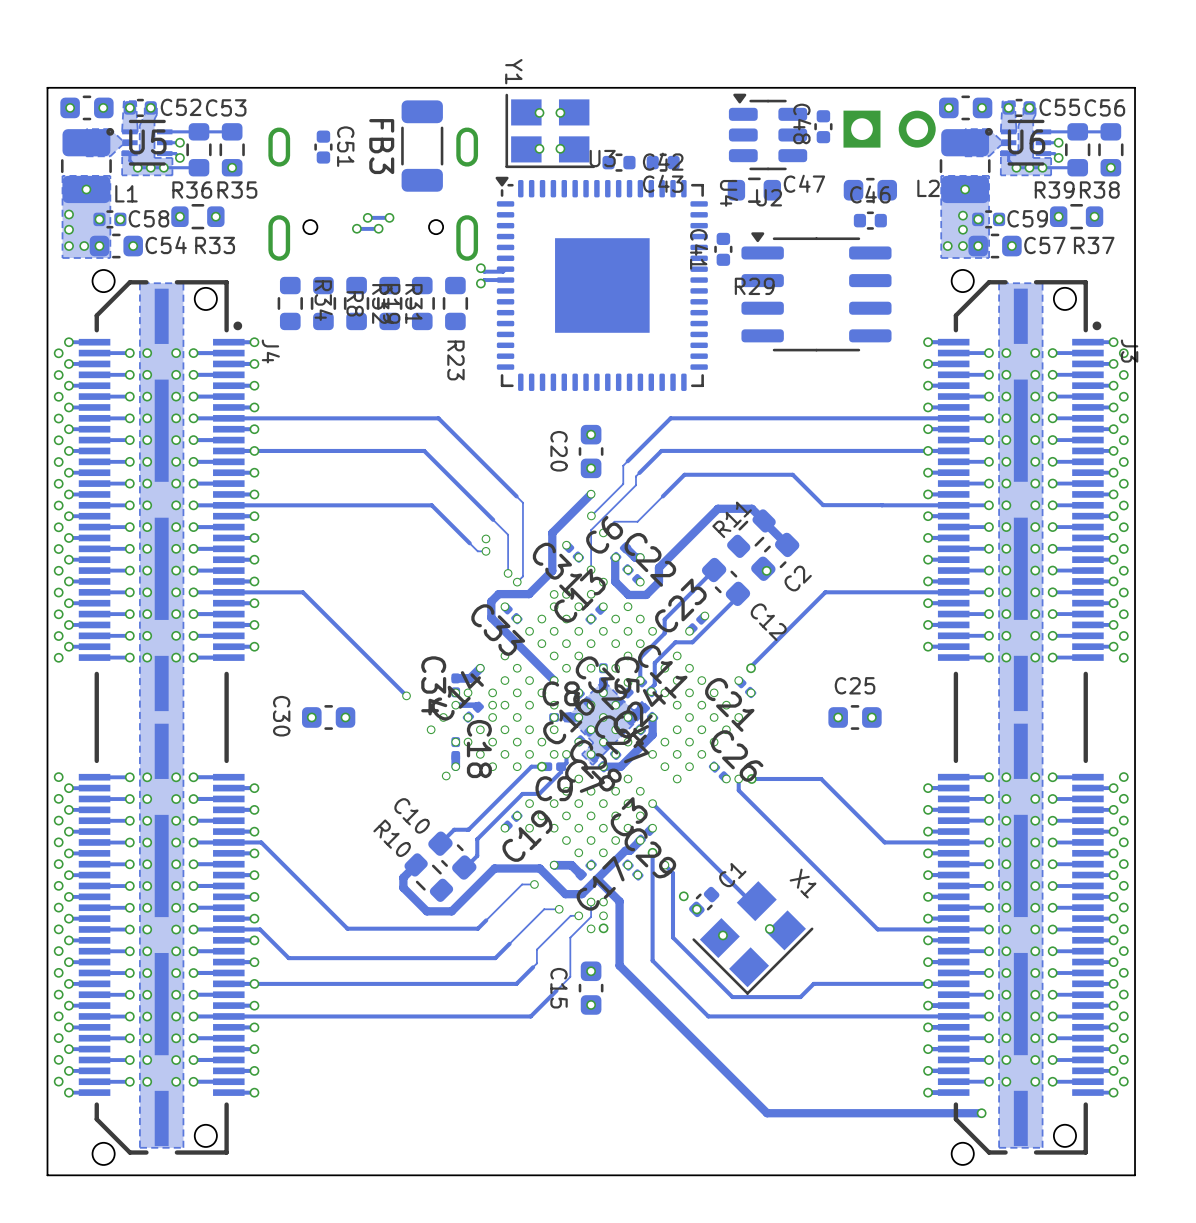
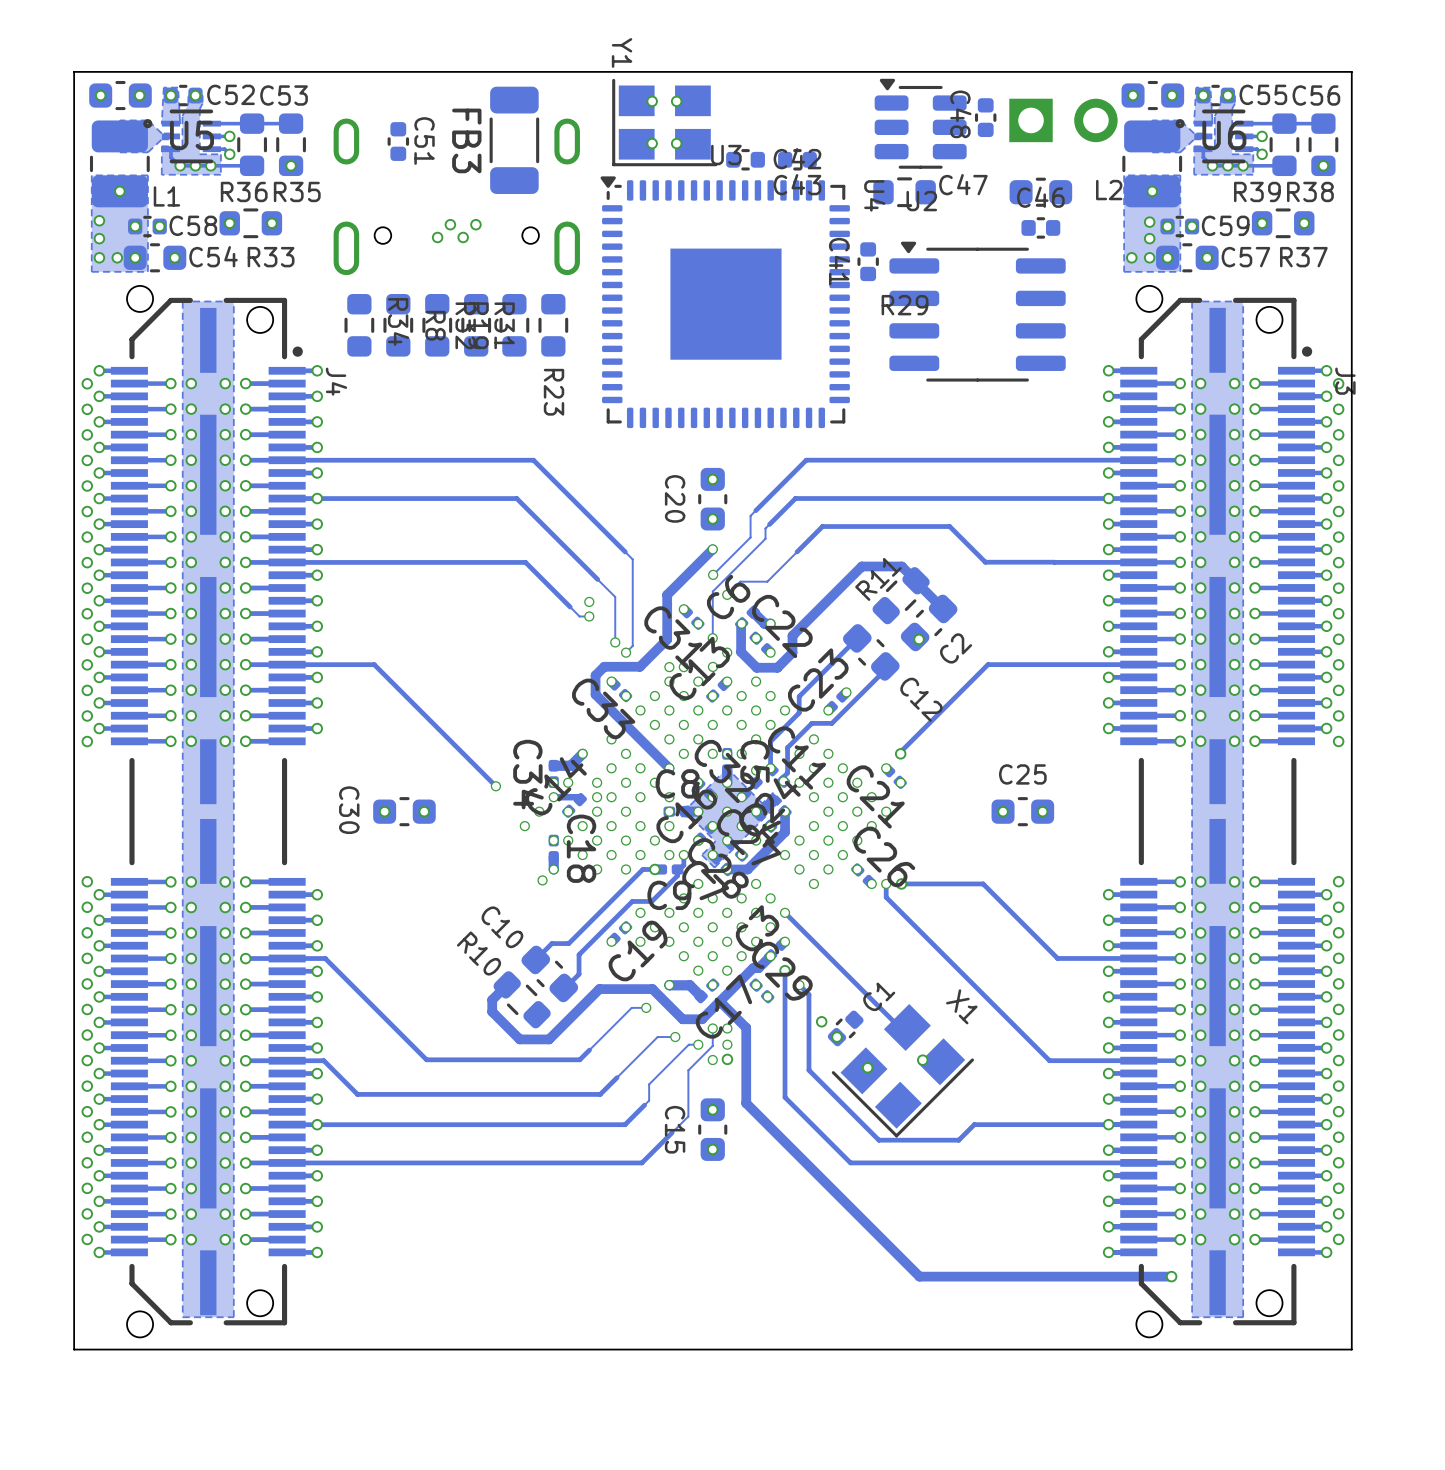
track: (389, 217) (367, 217) -> none
track: (378, 228) (356, 228) -> none
track: (480, 268) (484, 271) (503, 271) (505, 269) -> none
via: (480, 268) -> none
via: (480, 283) -> none

